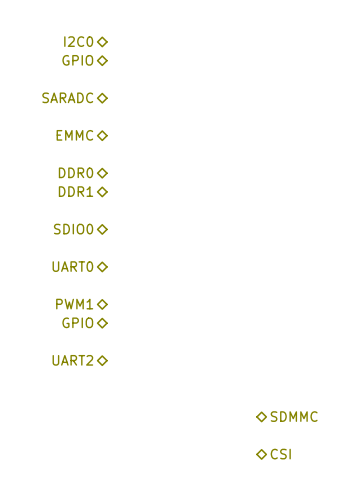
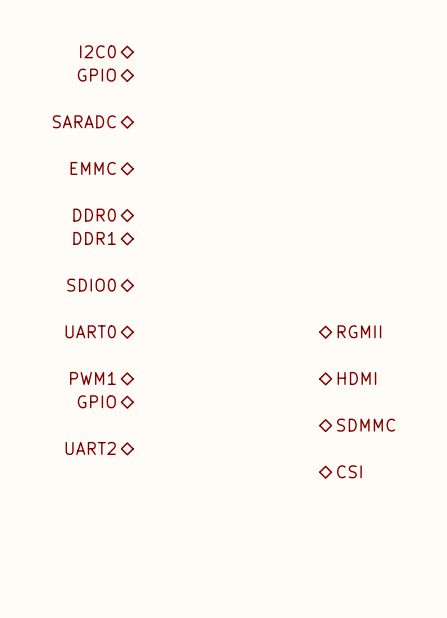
hierarchical label: none -> RGMII (359, 331)
hierarchical label: none -> HDMI (356, 378)
hierarchical label position: SDMMC (294, 416) -> SDMMC (366, 425)
hierarchical label position: CSI (280, 454) -> CSI (349, 471)

